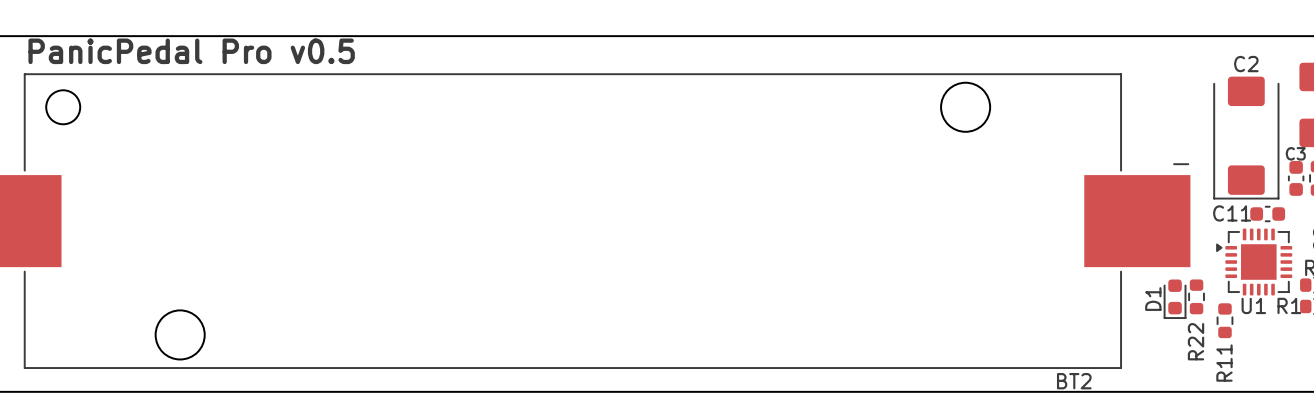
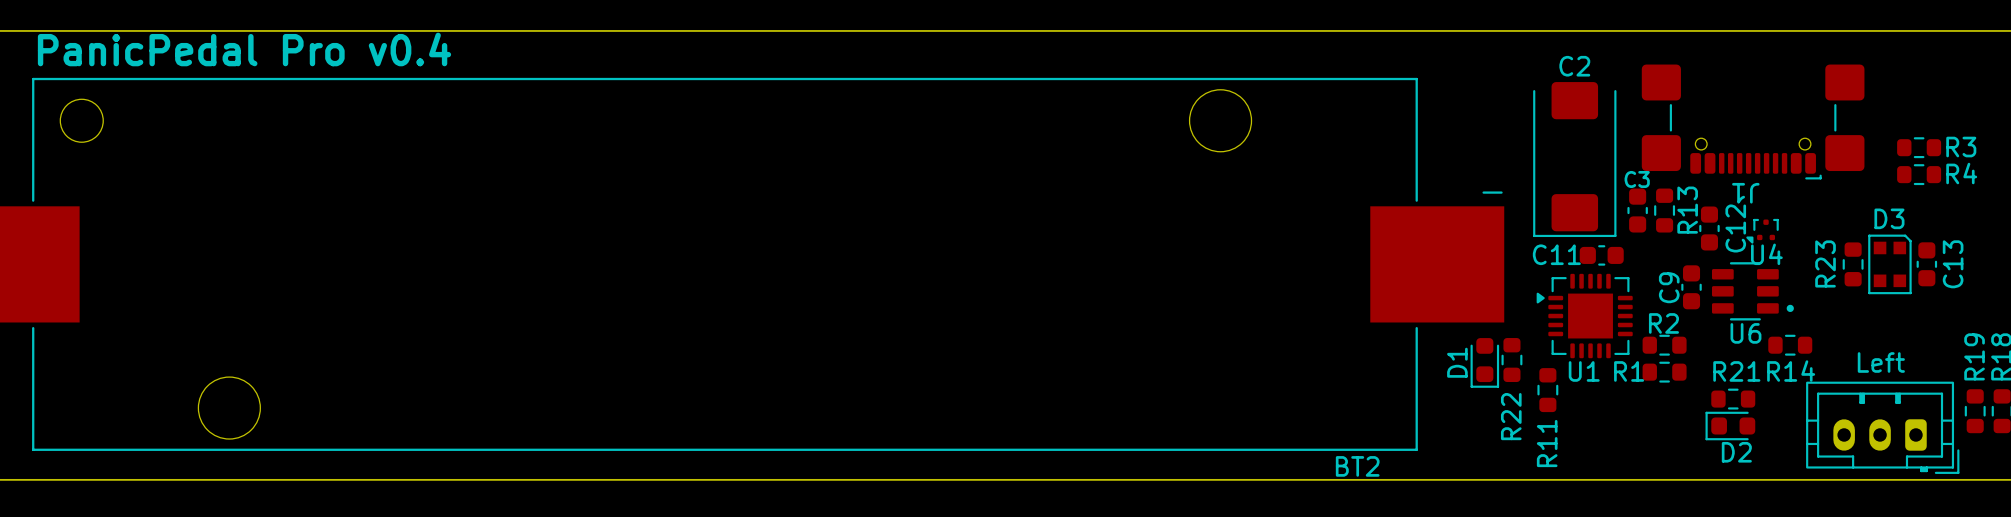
text: PanicPedal Pro v0.5 (191, 51) -> PanicPedal Pro v0.4 (244, 49)

